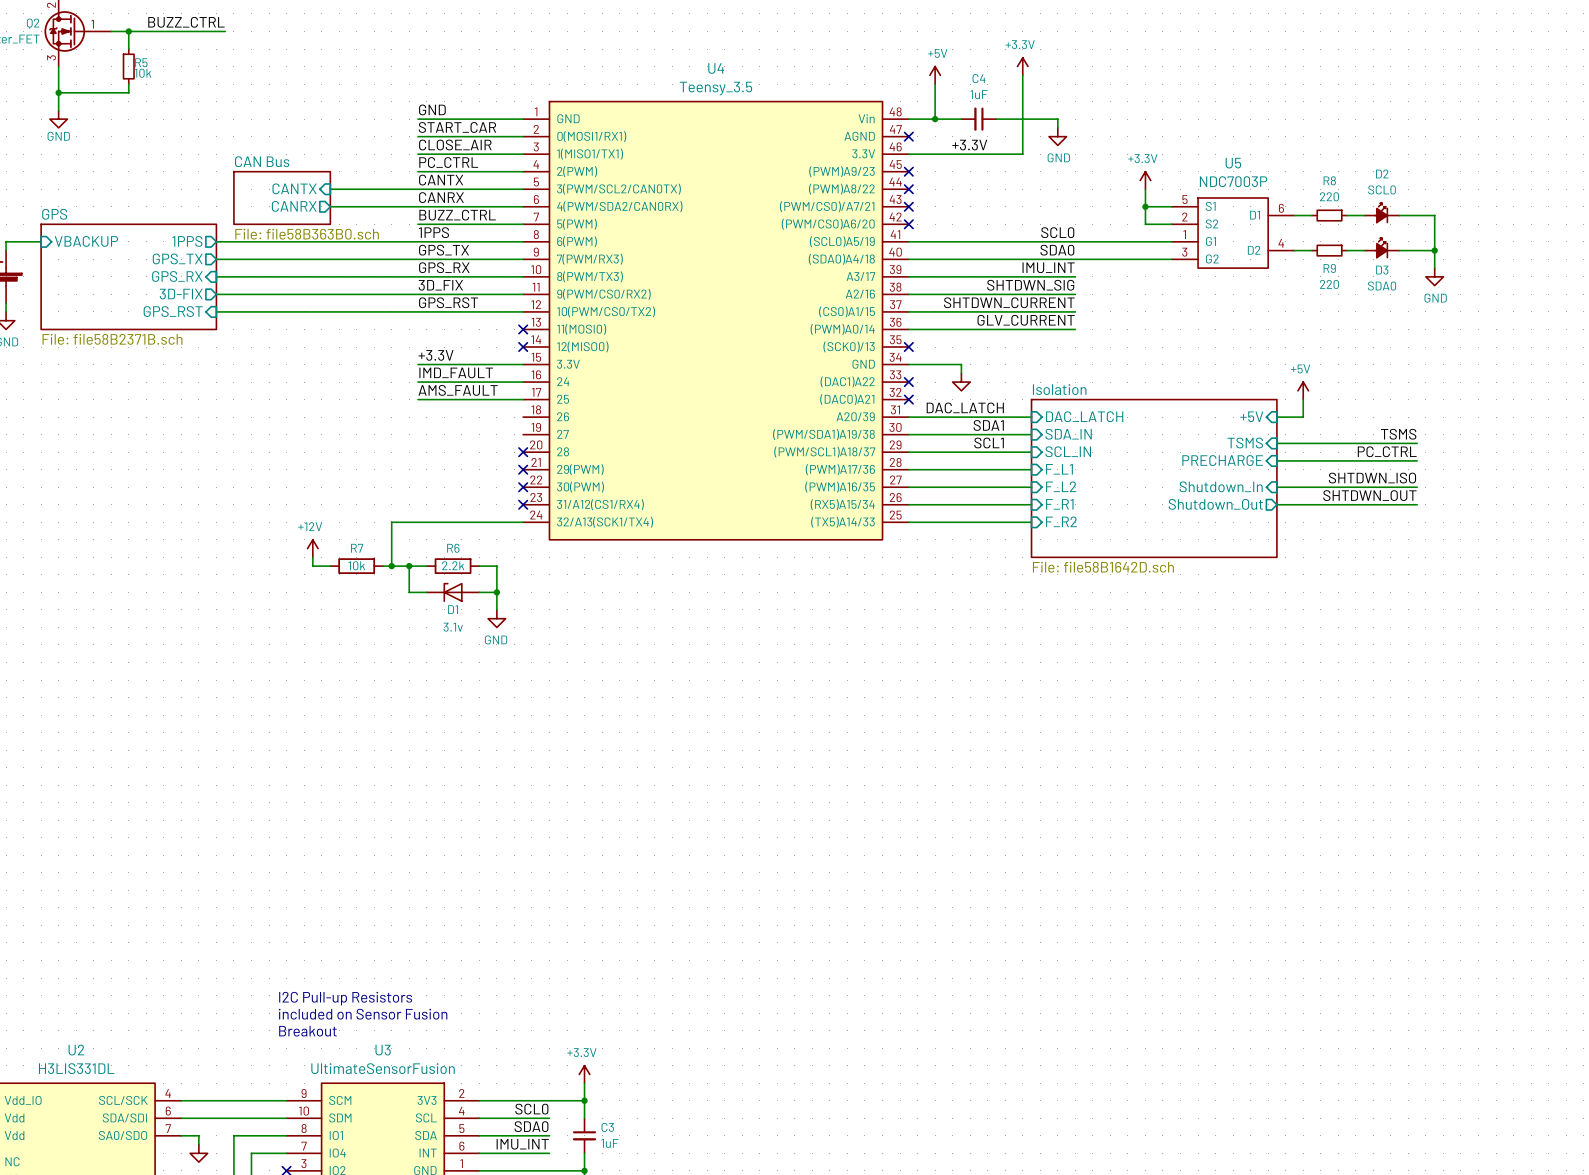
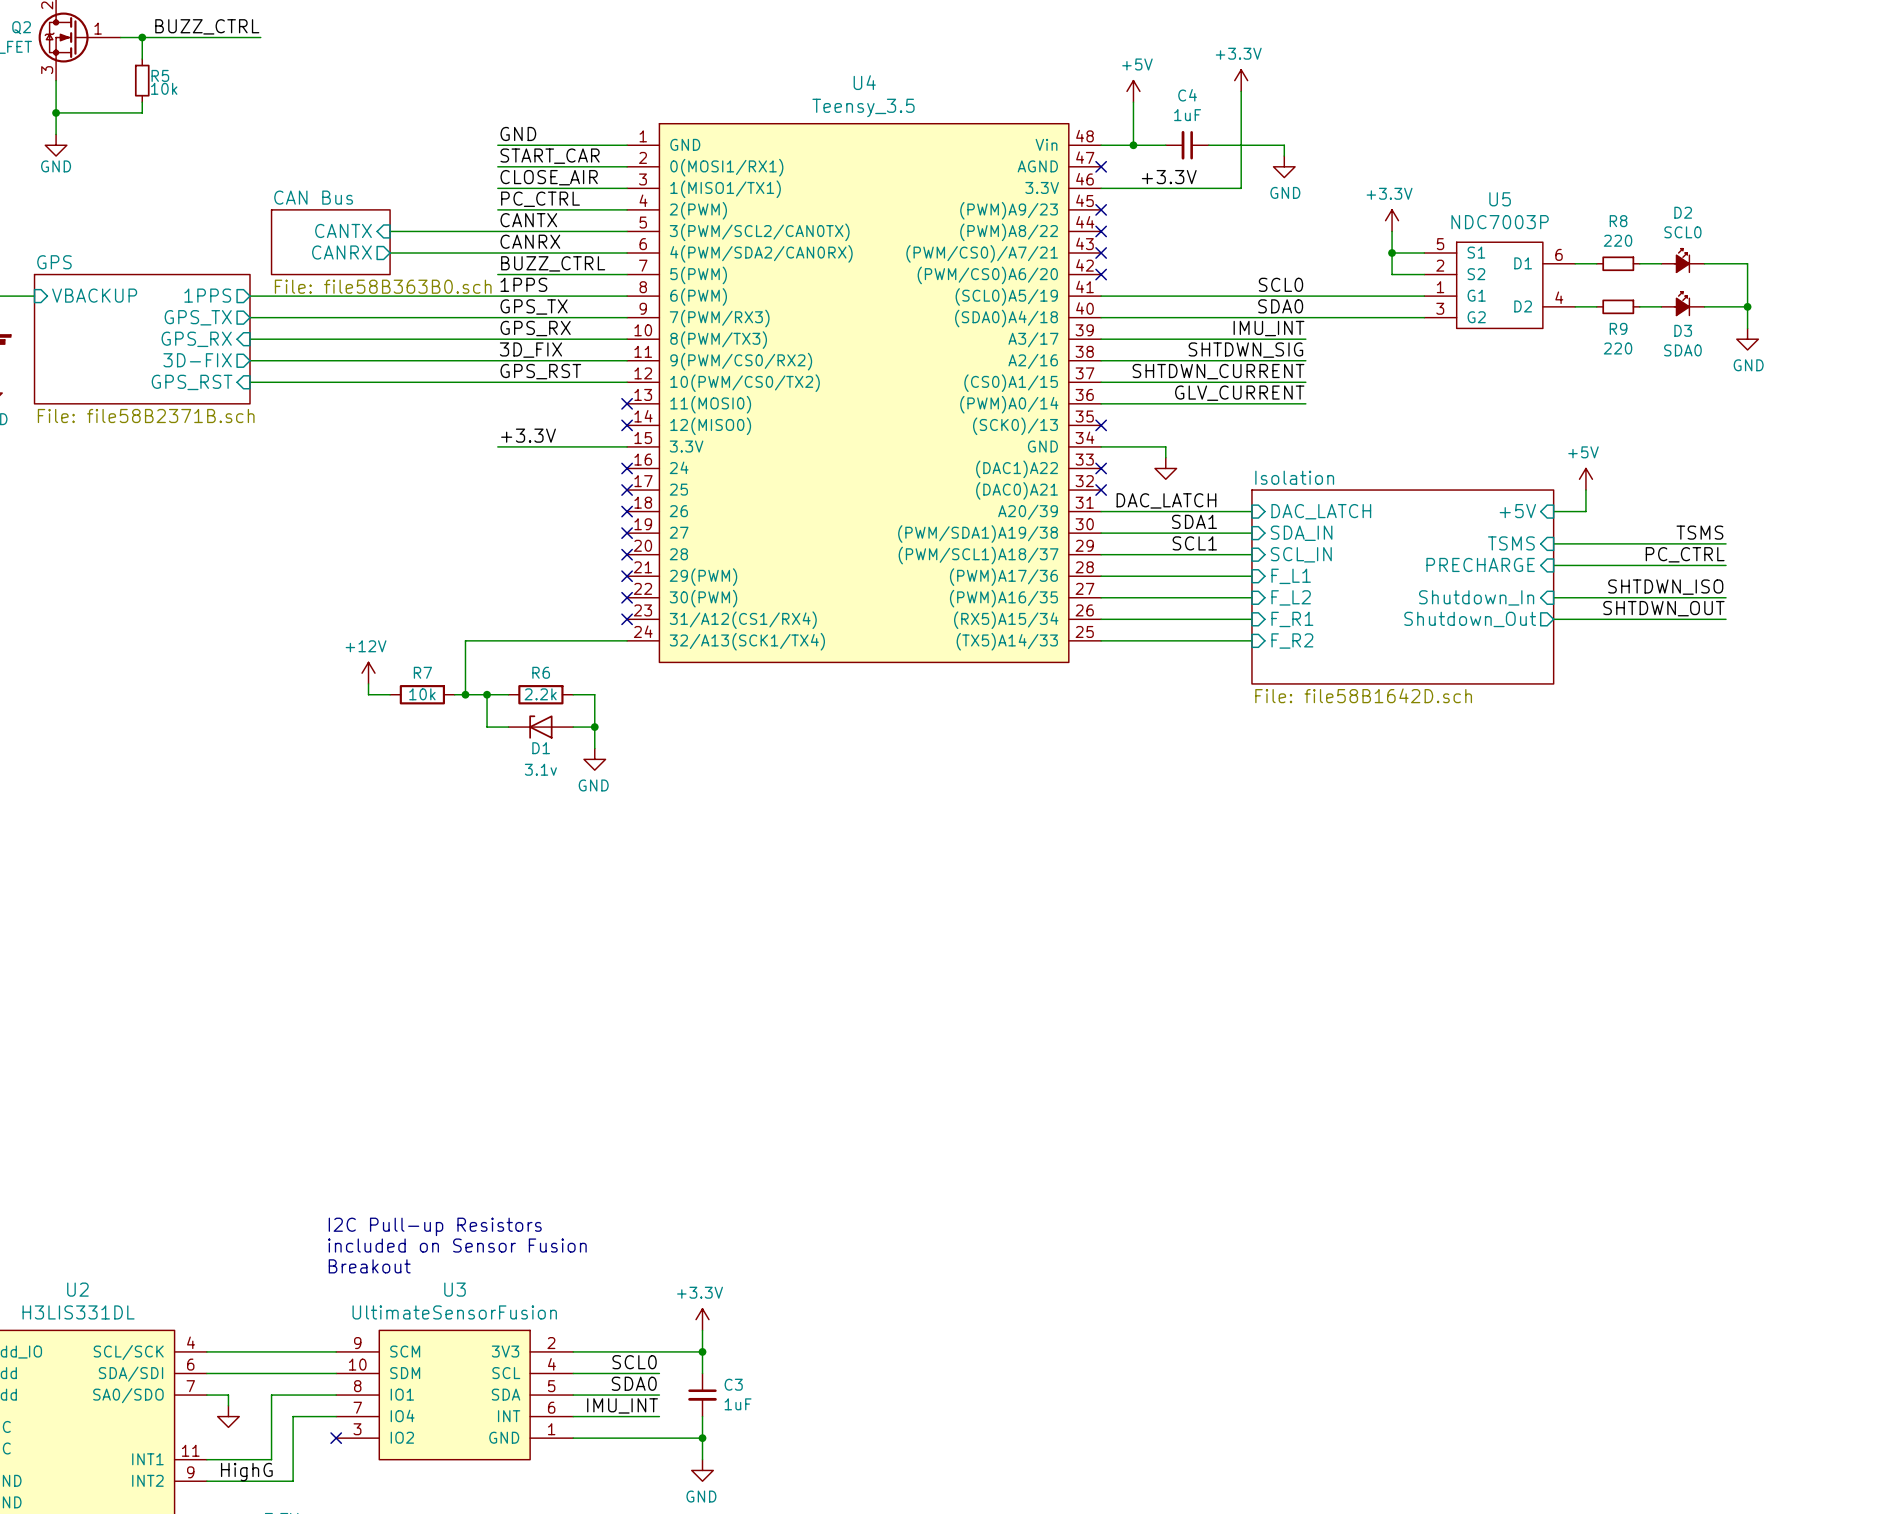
label: IMD_FAULT (456, 372) -> none
wire: (418, 382) (523, 382) -> none
no-connect mark: none -> (627, 468)
label: AMS_FAULT (458, 390) -> none
wire: (418, 399) (523, 399) -> none
no-connect mark: none -> (627, 490)
no-connect mark: none -> (627, 511)
no-connect mark: none -> (627, 533)

